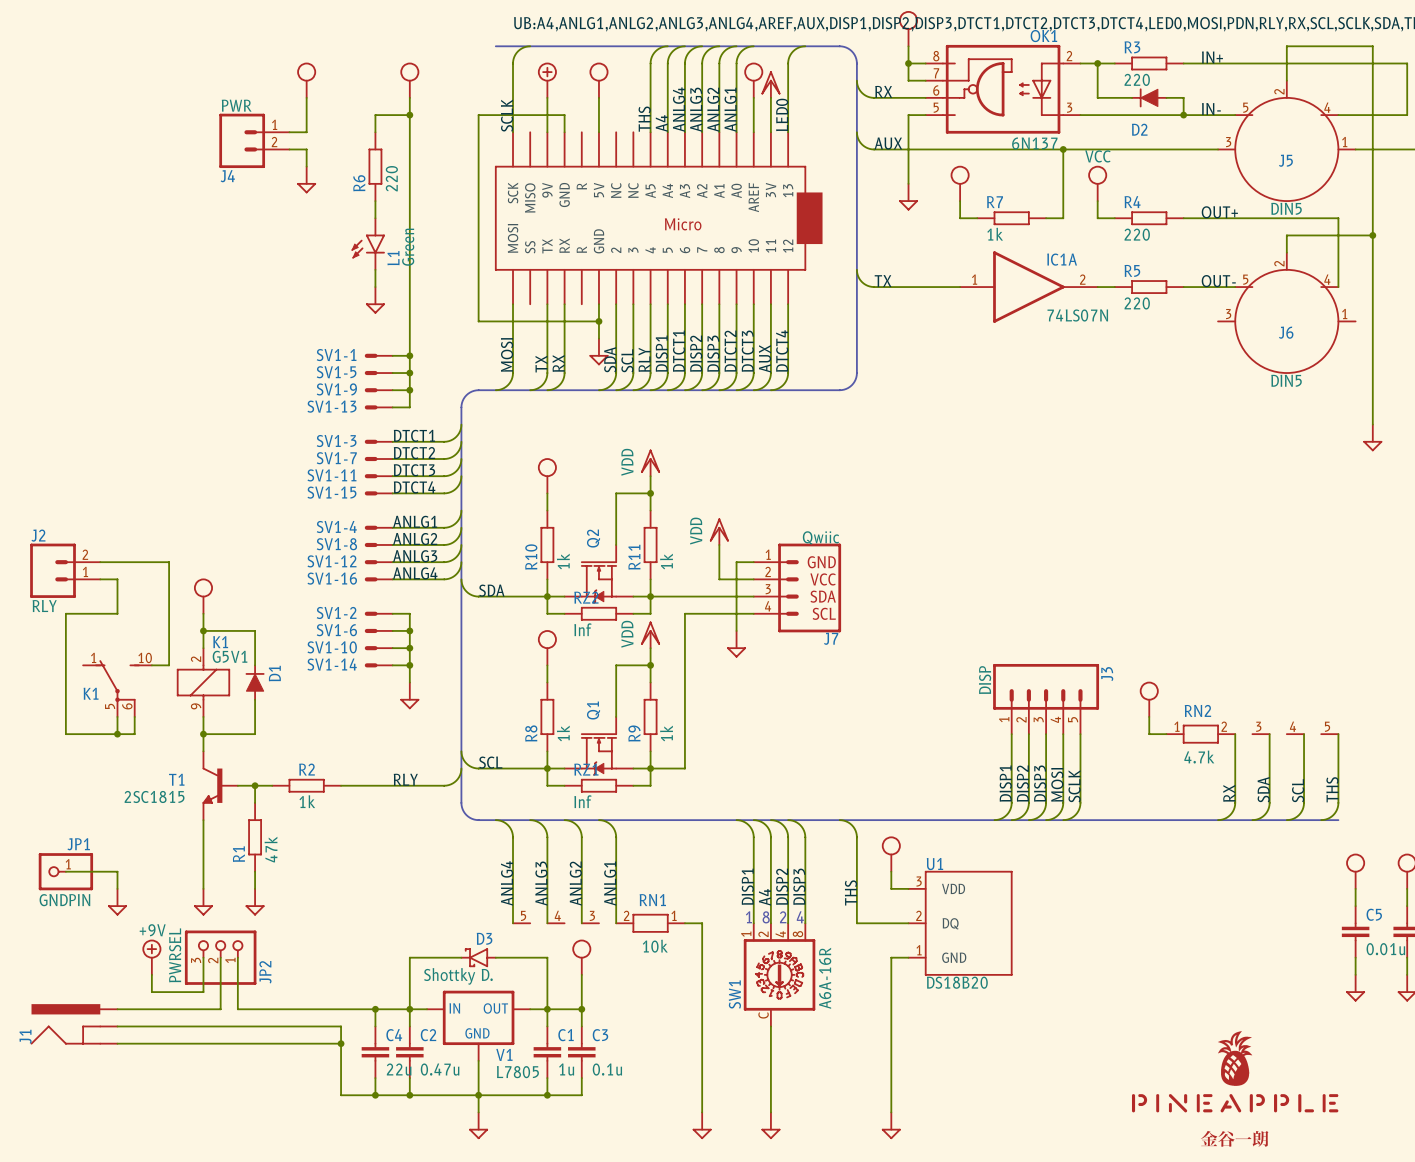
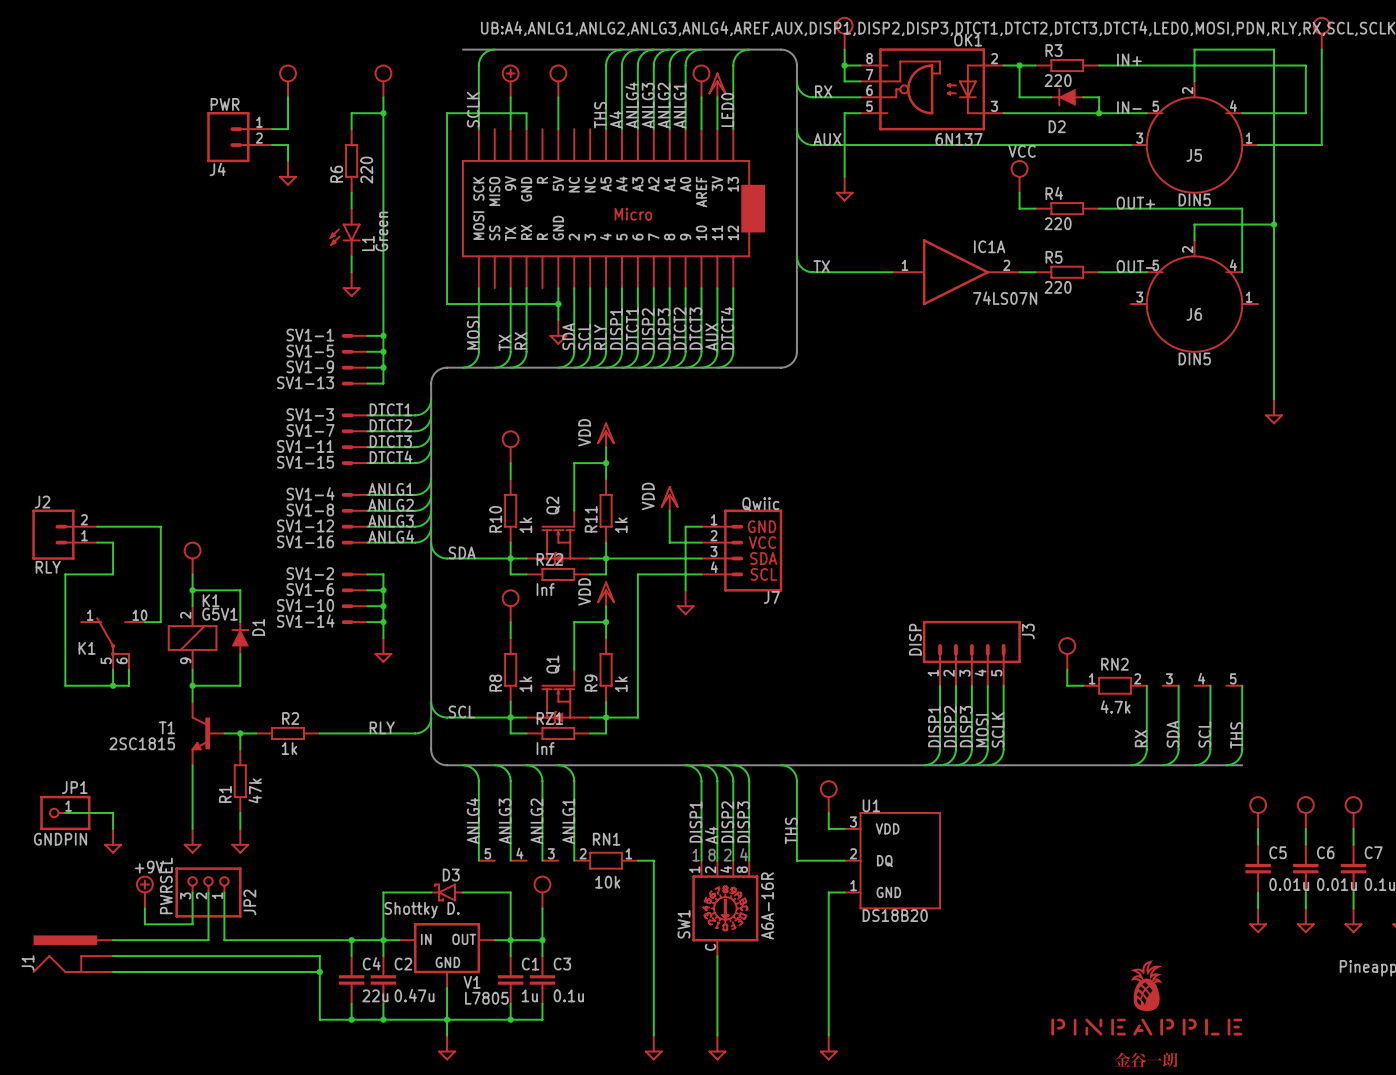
wire: (1063, 149) (1063, 218) (1046, 218) -> none
junction: (1063, 149) -> none
power symbol: (960, 183) -> none
wire: (960, 201) (960, 218) (977, 218) -> none
R7: 1k (1011, 218) -> none

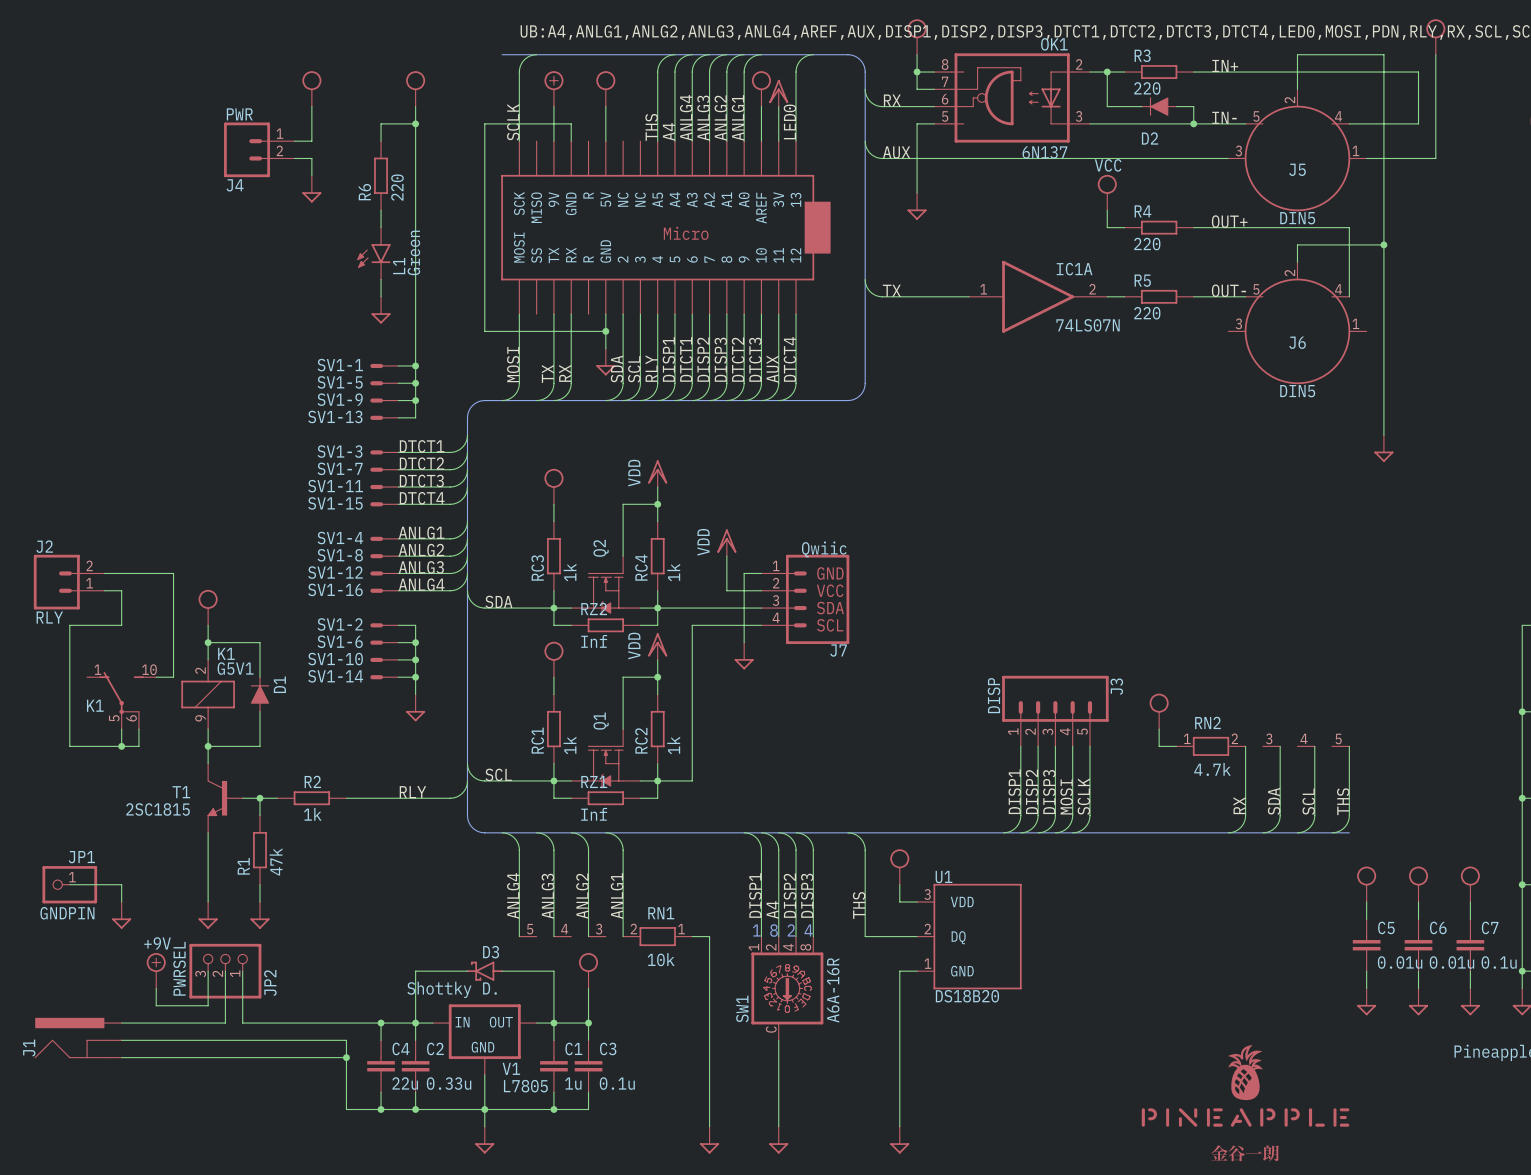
R10 name: R10 (495, 519) -> RC3 (537, 568)
R11 name: R11 (591, 519) -> RC4 (641, 567)
R8 name: R8 (495, 683) -> RC1 (537, 740)
R9 name: R9 (591, 683) -> RC2 (641, 740)
C2 value: 0.47u (414, 995) -> 0.33u (449, 1083)

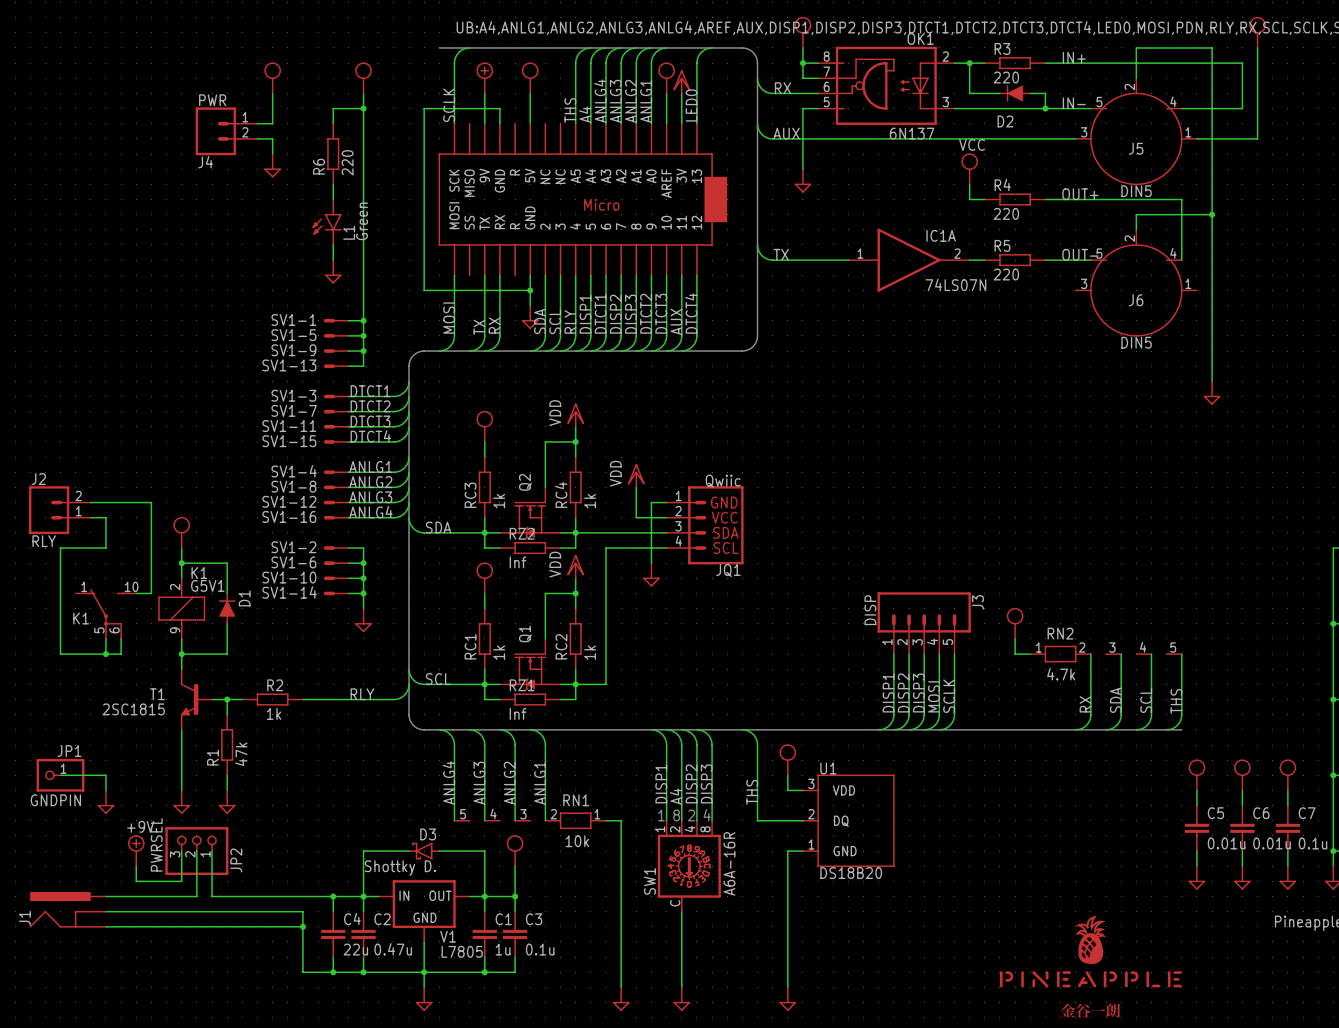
J7 name: J7 (838, 650) -> JQ1 (728, 570)
C2 value: 0.33u (449, 1083) -> 0.47u (393, 949)

